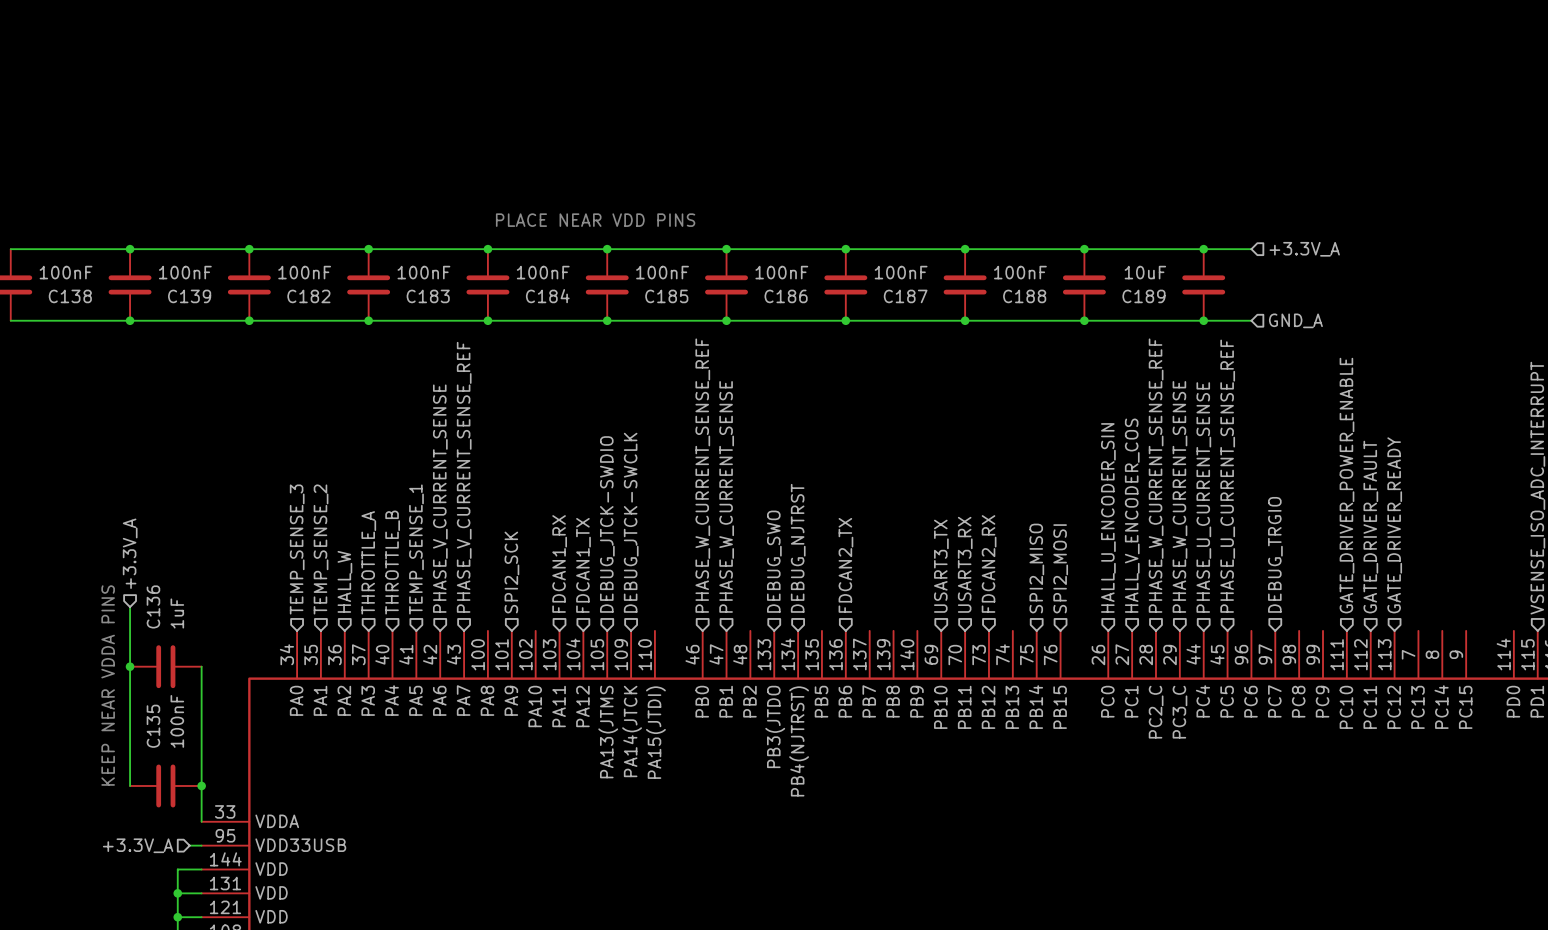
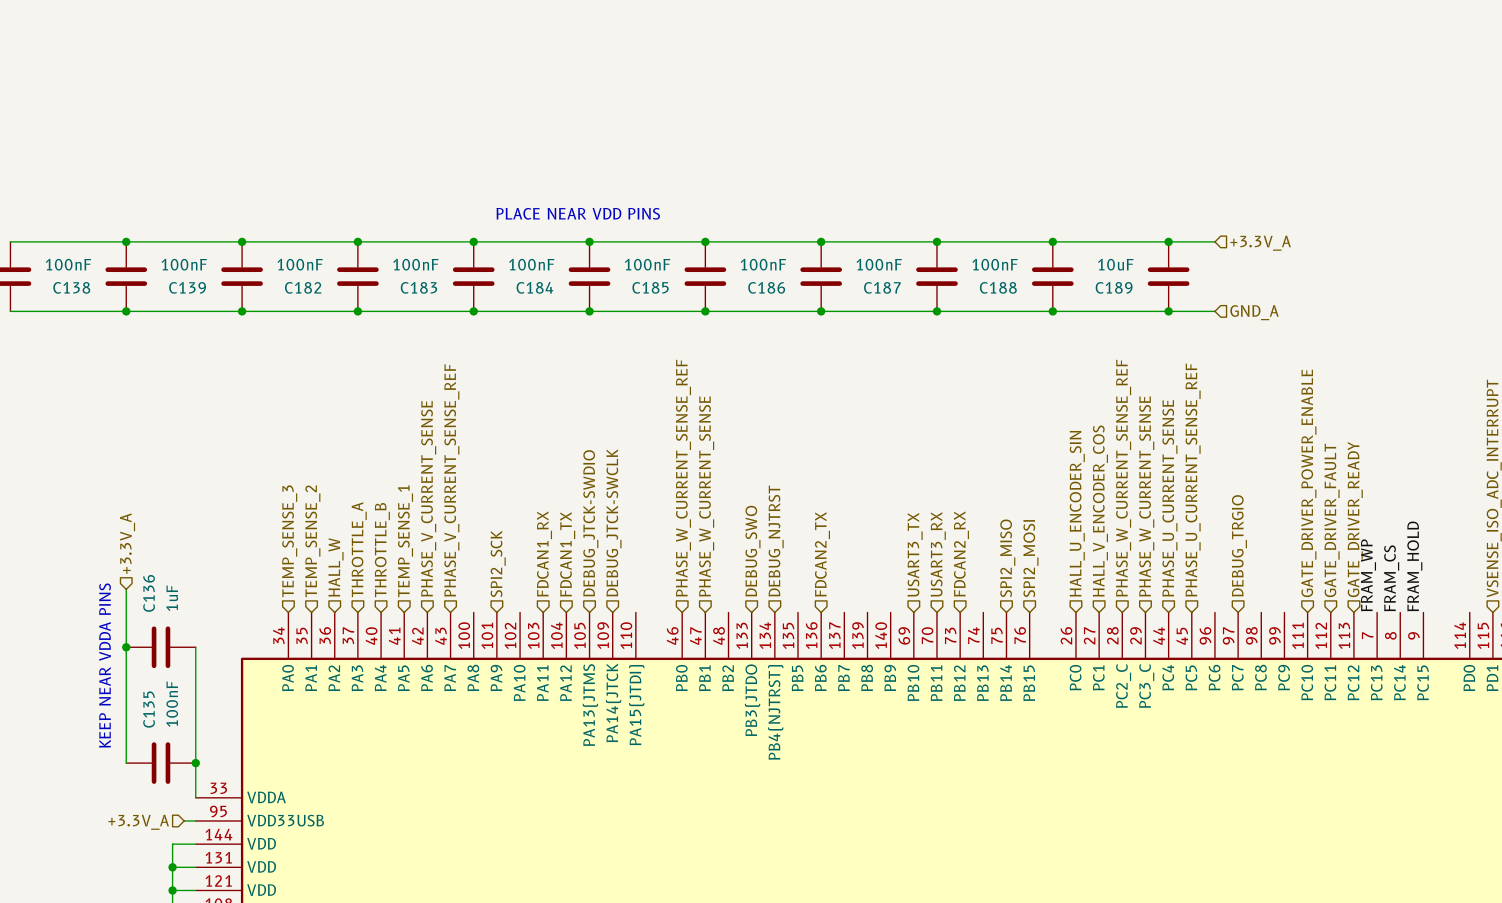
label: none -> FRAM_HOLD (1414, 566)
label: none -> FRAM_WP (1368, 575)
label: none -> FRAM_CS (1391, 578)

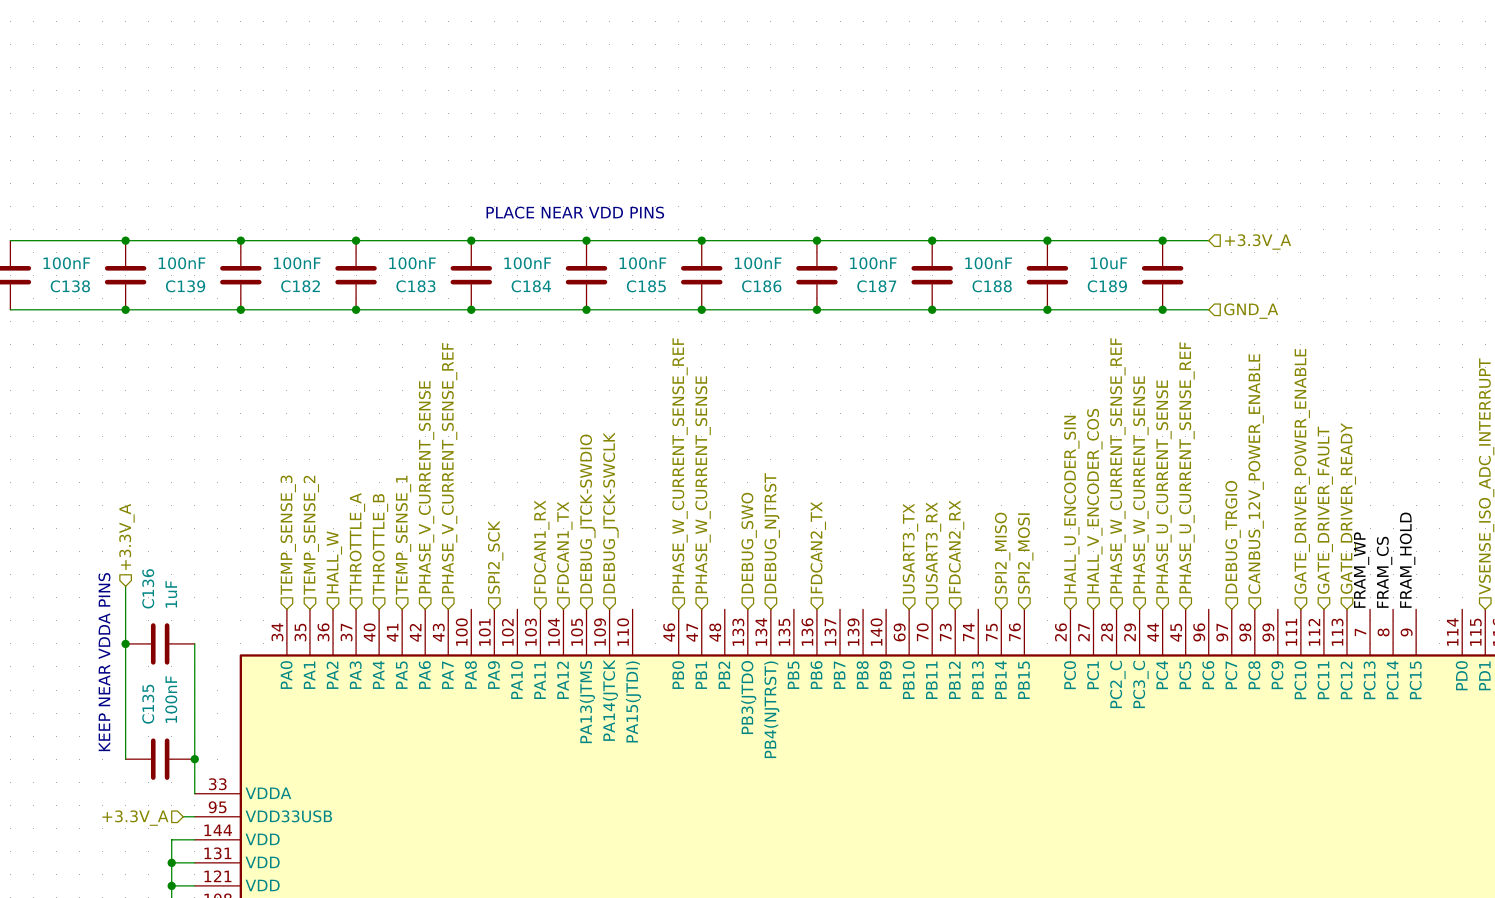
hierarchical label: none -> CANBUS_12V_POWER_ENABLE (1256, 474)

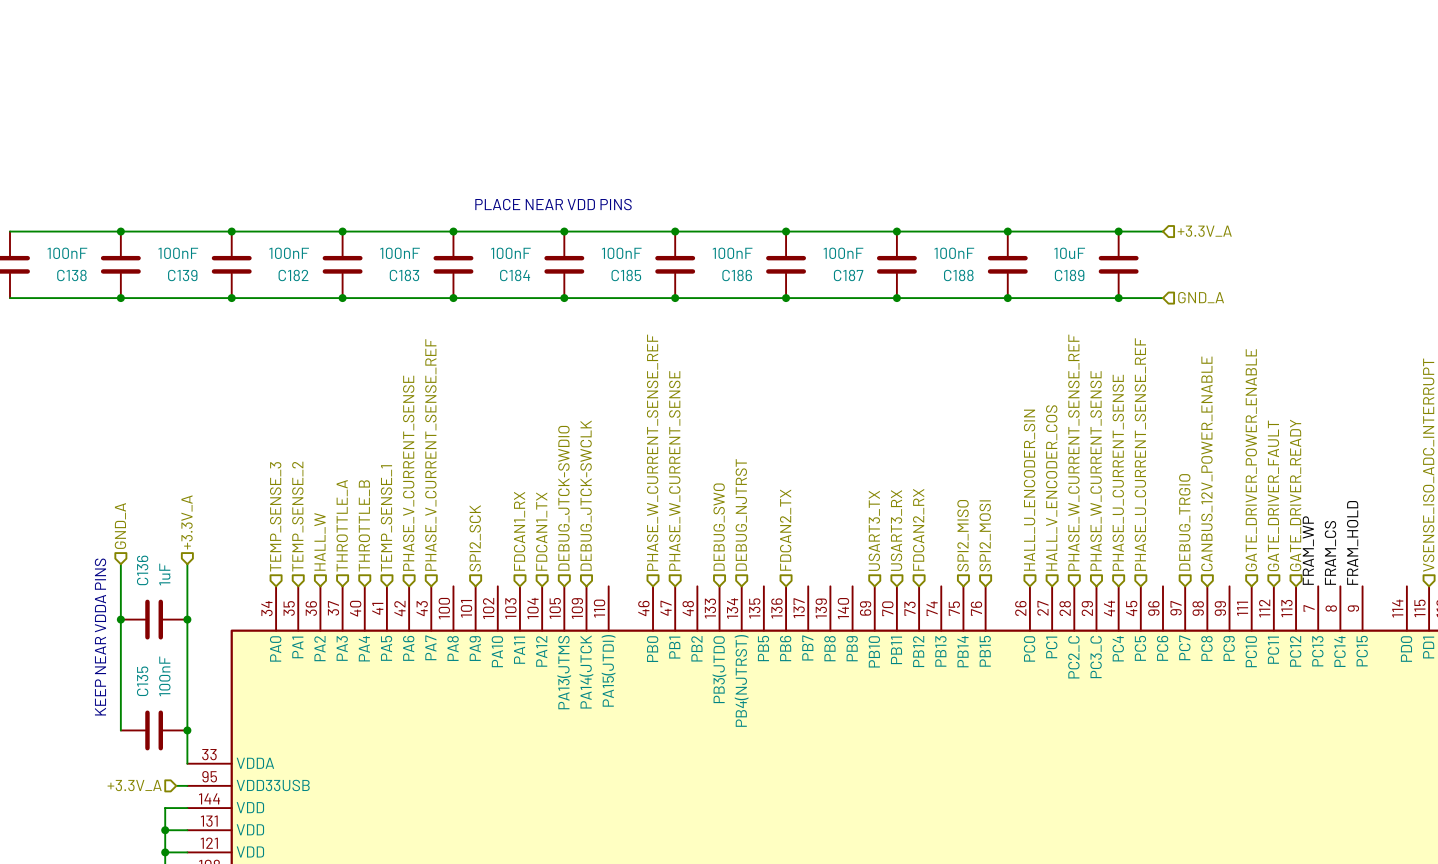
hierarchical label: +3.3V_A (126, 536) -> GND_A (120, 526)
hierarchical label: none -> +3.3V_A (187, 522)
wire: none -> (187, 564) (187, 619)
junction: none -> (187, 619)

